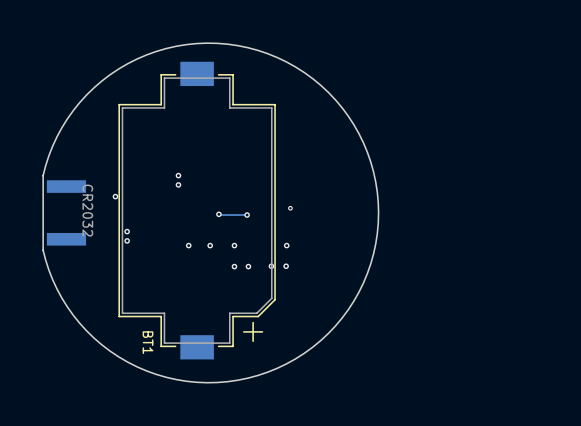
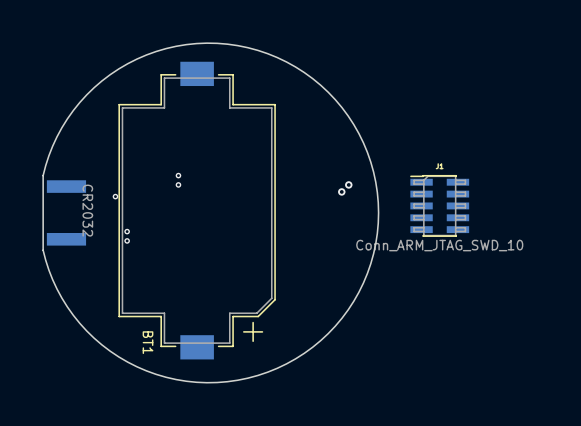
via: none -> (348, 184)
via: none -> (341, 191)
part: none -> Conn_ARM_JTAG_SWD_10 (439, 205)
via: (290, 208) -> none
track: (218, 214) (247, 215) -> none
via: (218, 214) -> none
via: (247, 215) -> none
via: (188, 245) -> none
via: (210, 245) -> none
via: (234, 245) -> none
via: (286, 245) -> none
via: (234, 266) -> none
via: (248, 266) -> none
via: (271, 266) -> none
via: (286, 266) -> none

